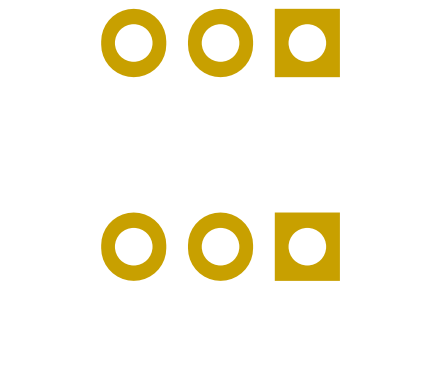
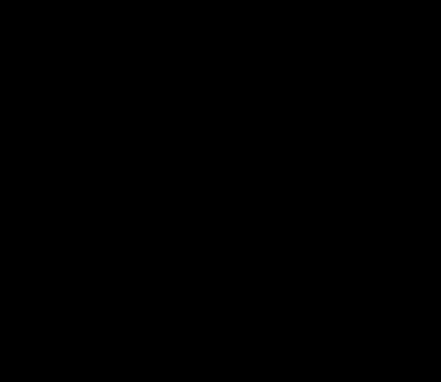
part: (220, 42) -> none
part: (220, 246) -> none

